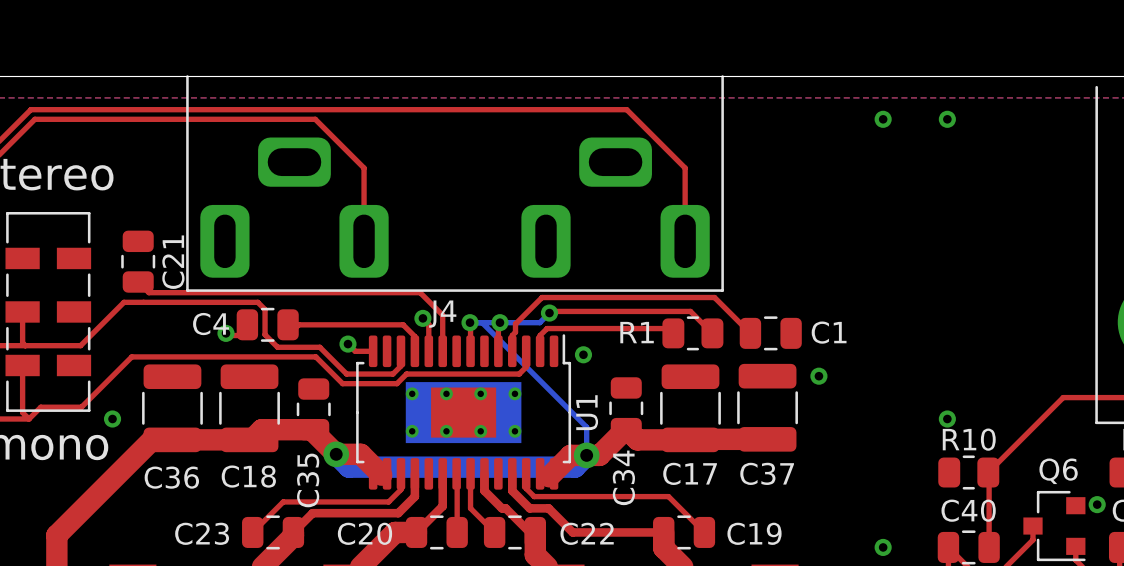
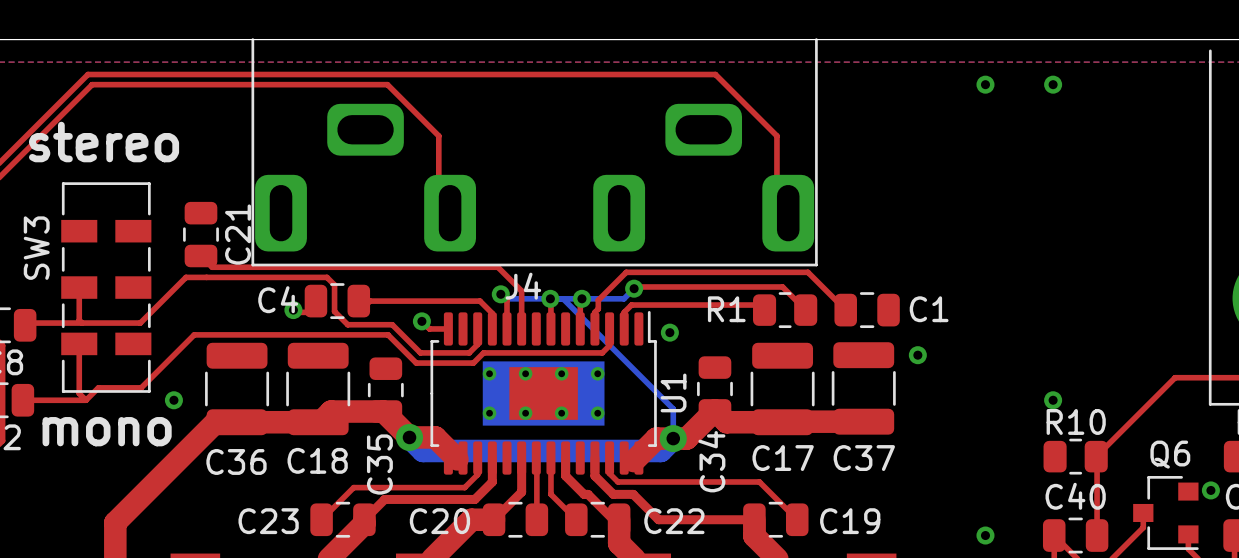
J4 footprint: [186, 75, 724, 292] -> [251, 38, 818, 267]
bottom track: none -> (500, 294) (505, 298) (550, 298)

